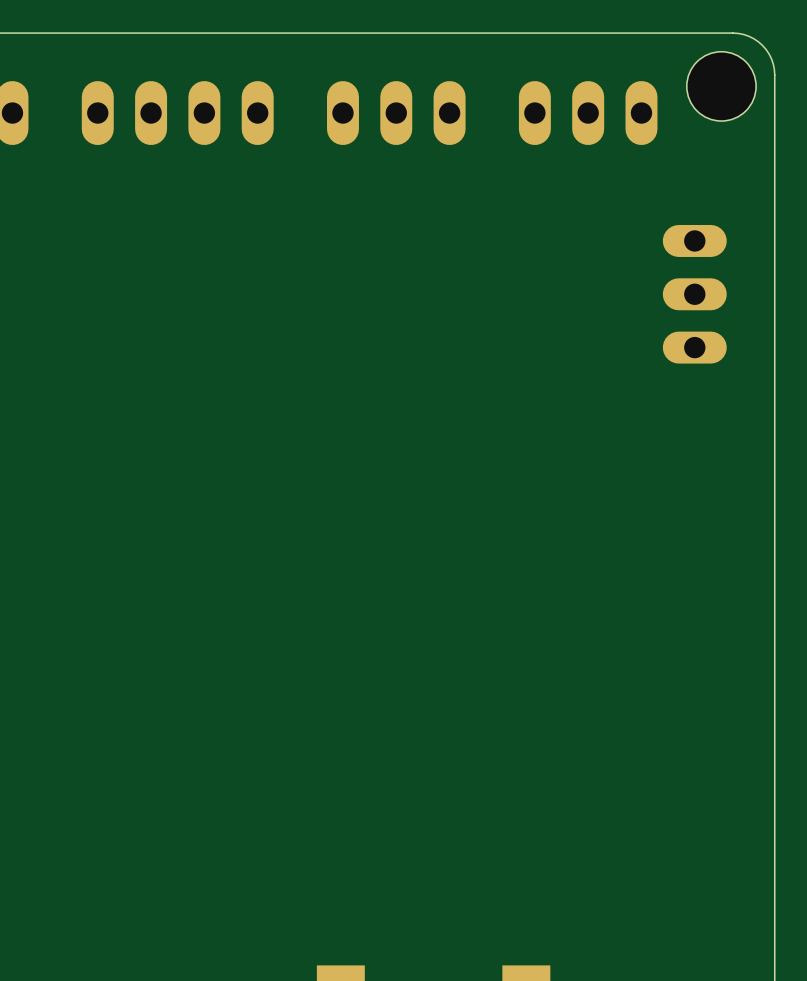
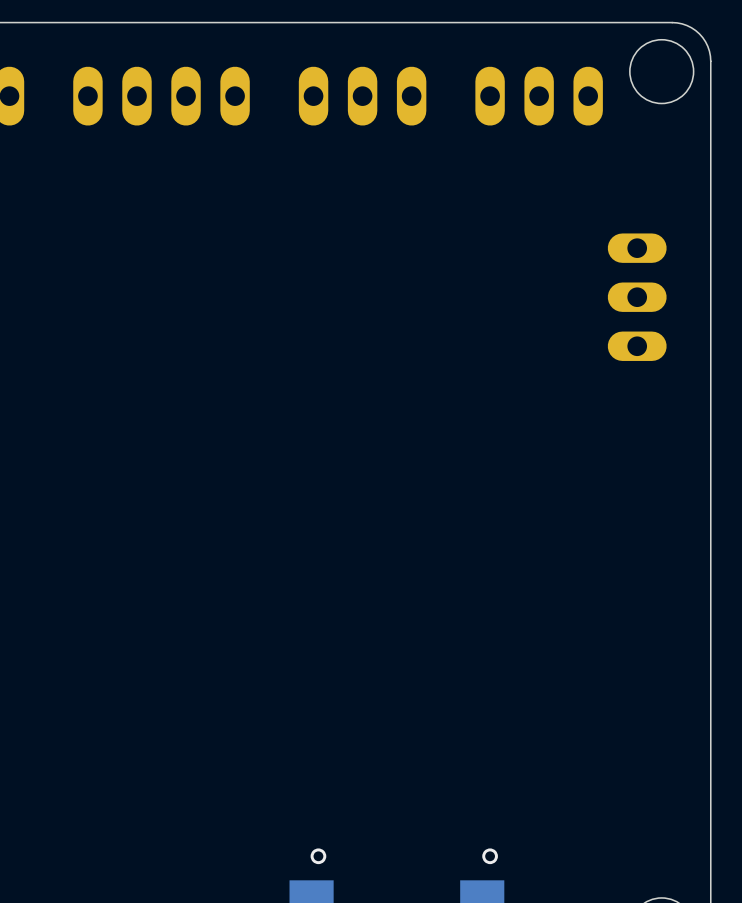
part position: (694, 294) -> (637, 297)
via: none -> (318, 856)
via: none -> (490, 856)

